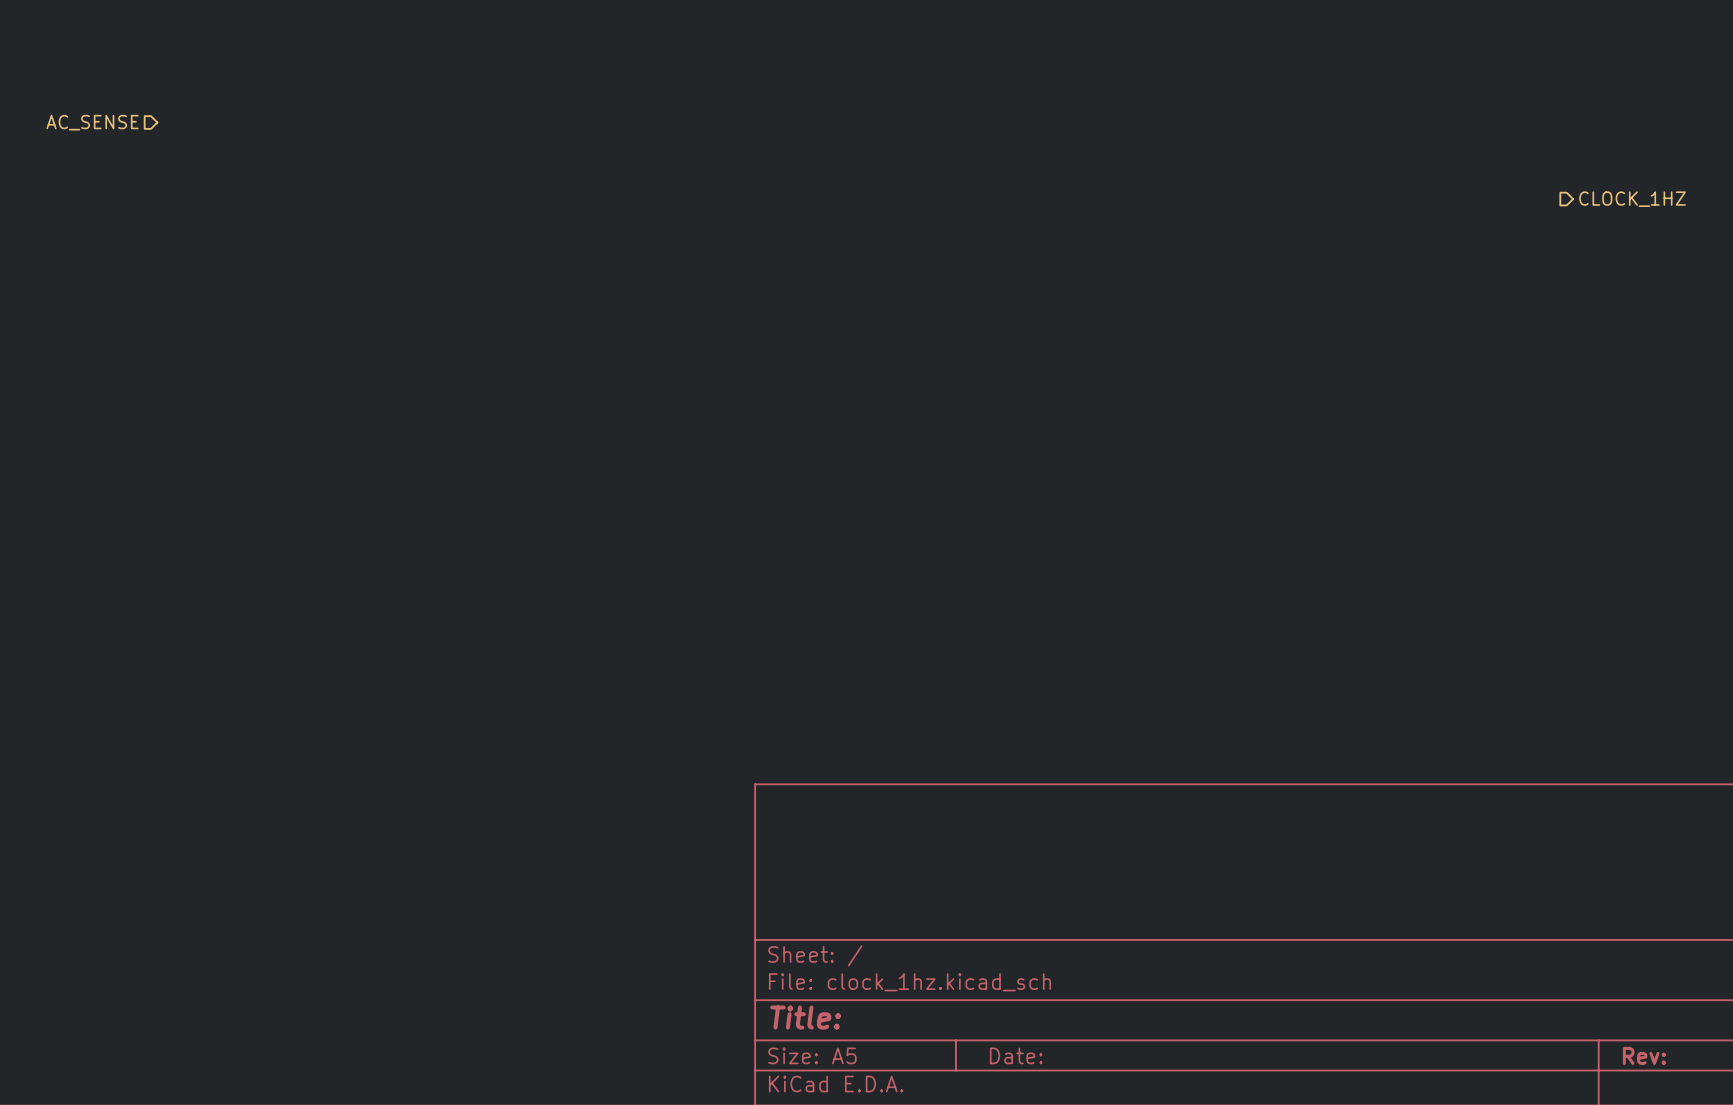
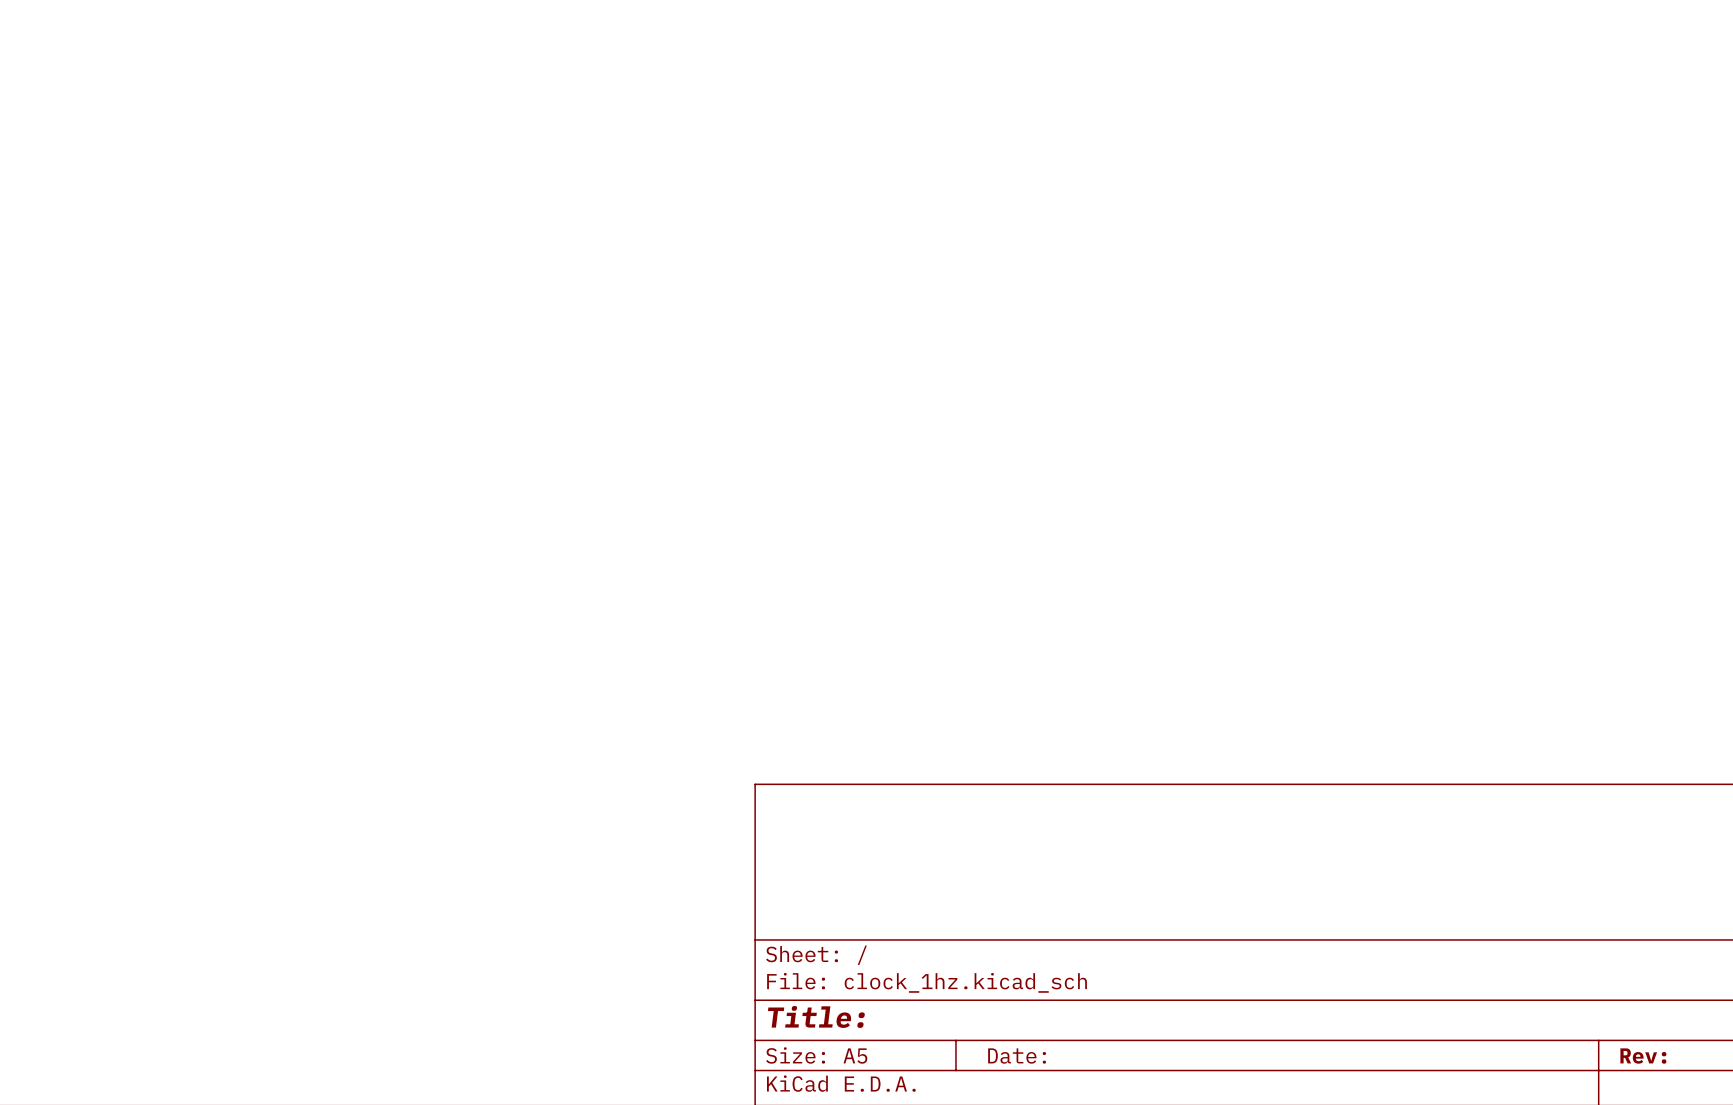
hierarchical label: AC_SENSE (92, 122) -> none
hierarchical label: CLOCK_1HZ (1632, 199) -> none

